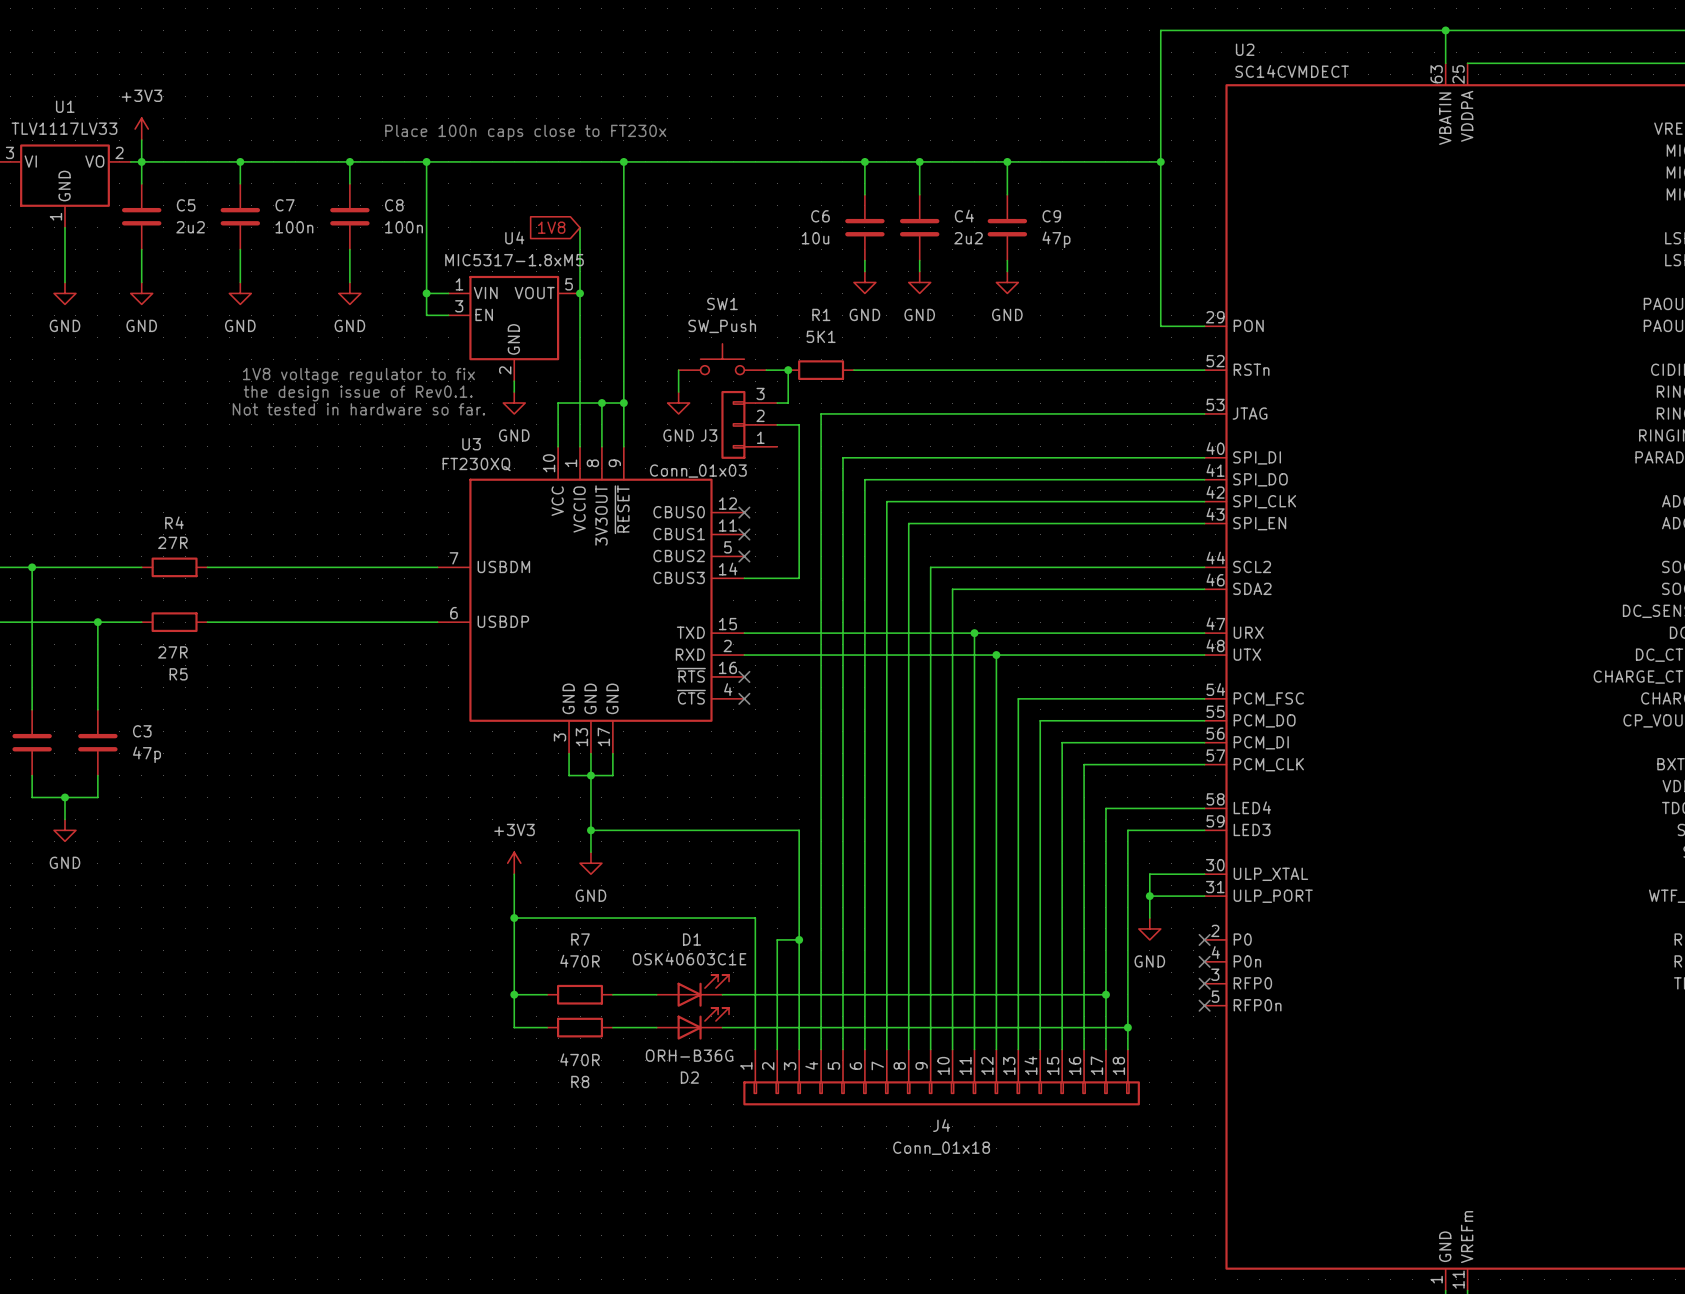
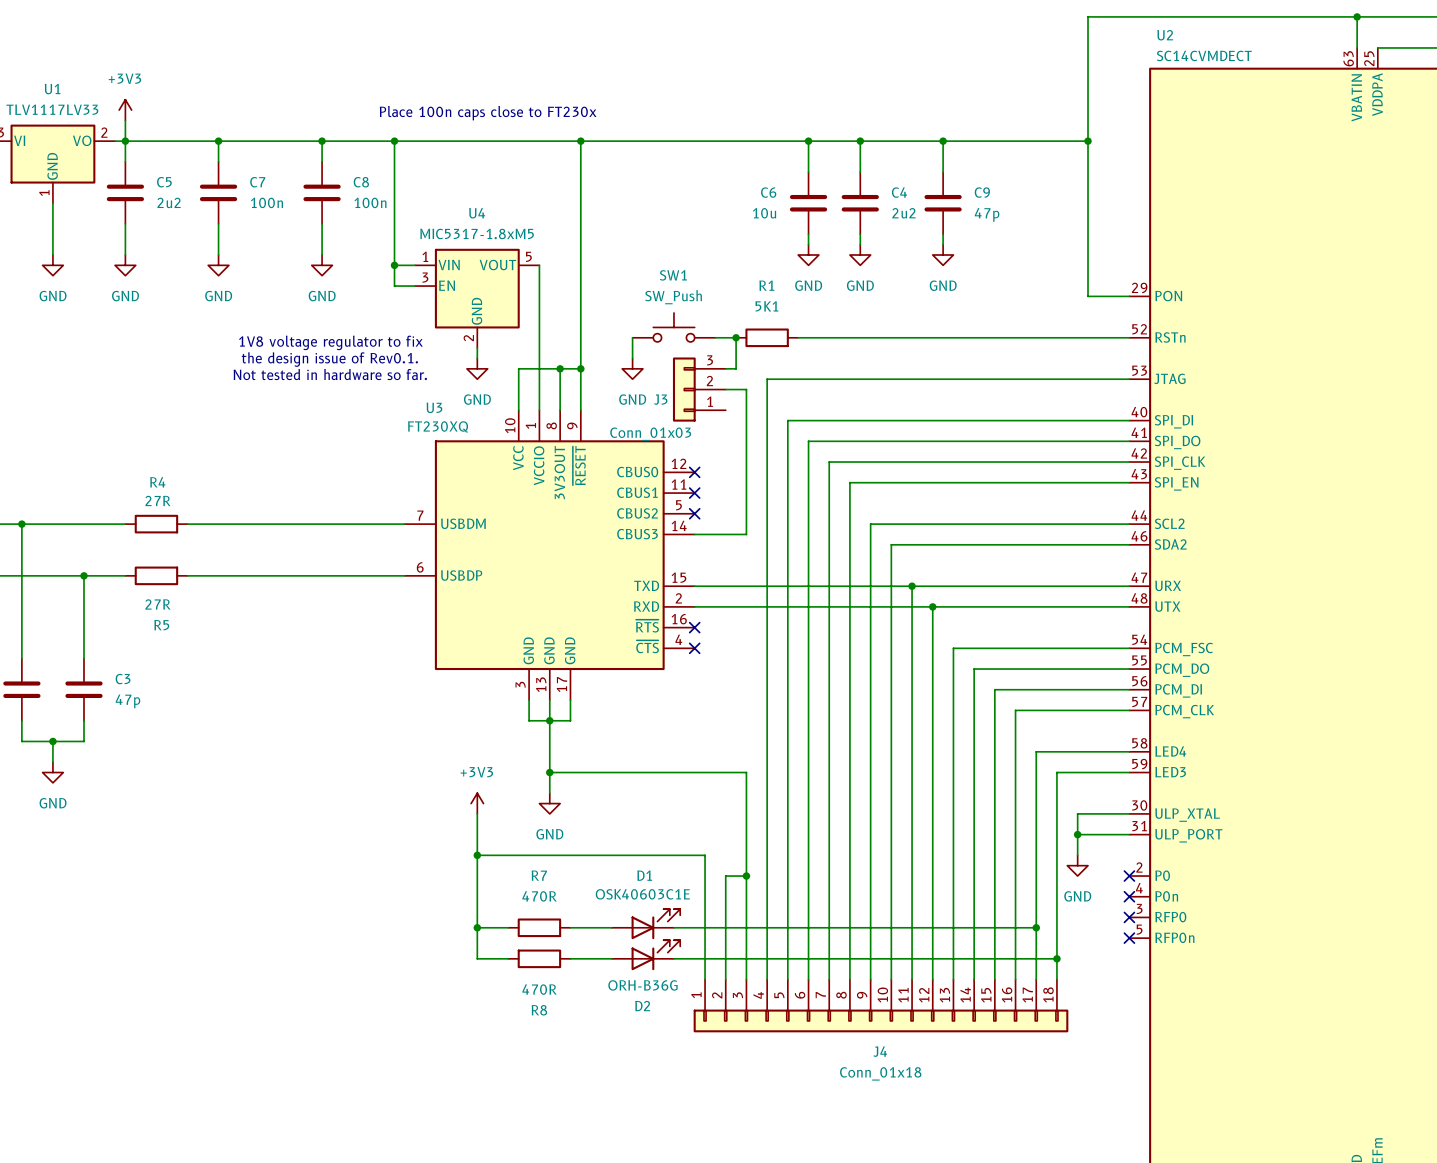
global label: 1V8 (551, 227) -> none
wire: (580, 227) (580, 293) -> none
junction: (580, 293) -> none

